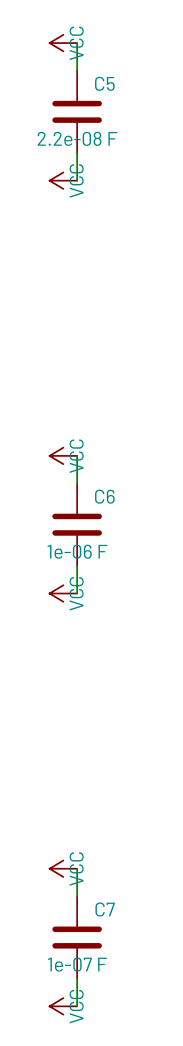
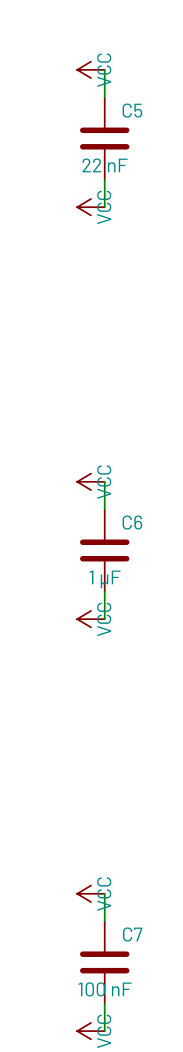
C5 value: 2.2e-08 F (77, 138) -> 22 nF (105, 165)
C6 value: 1e-06 F (77, 551) -> 1 µF (105, 579)
C7 value: 1e-07 F (77, 964) -> 100 nF (105, 989)

